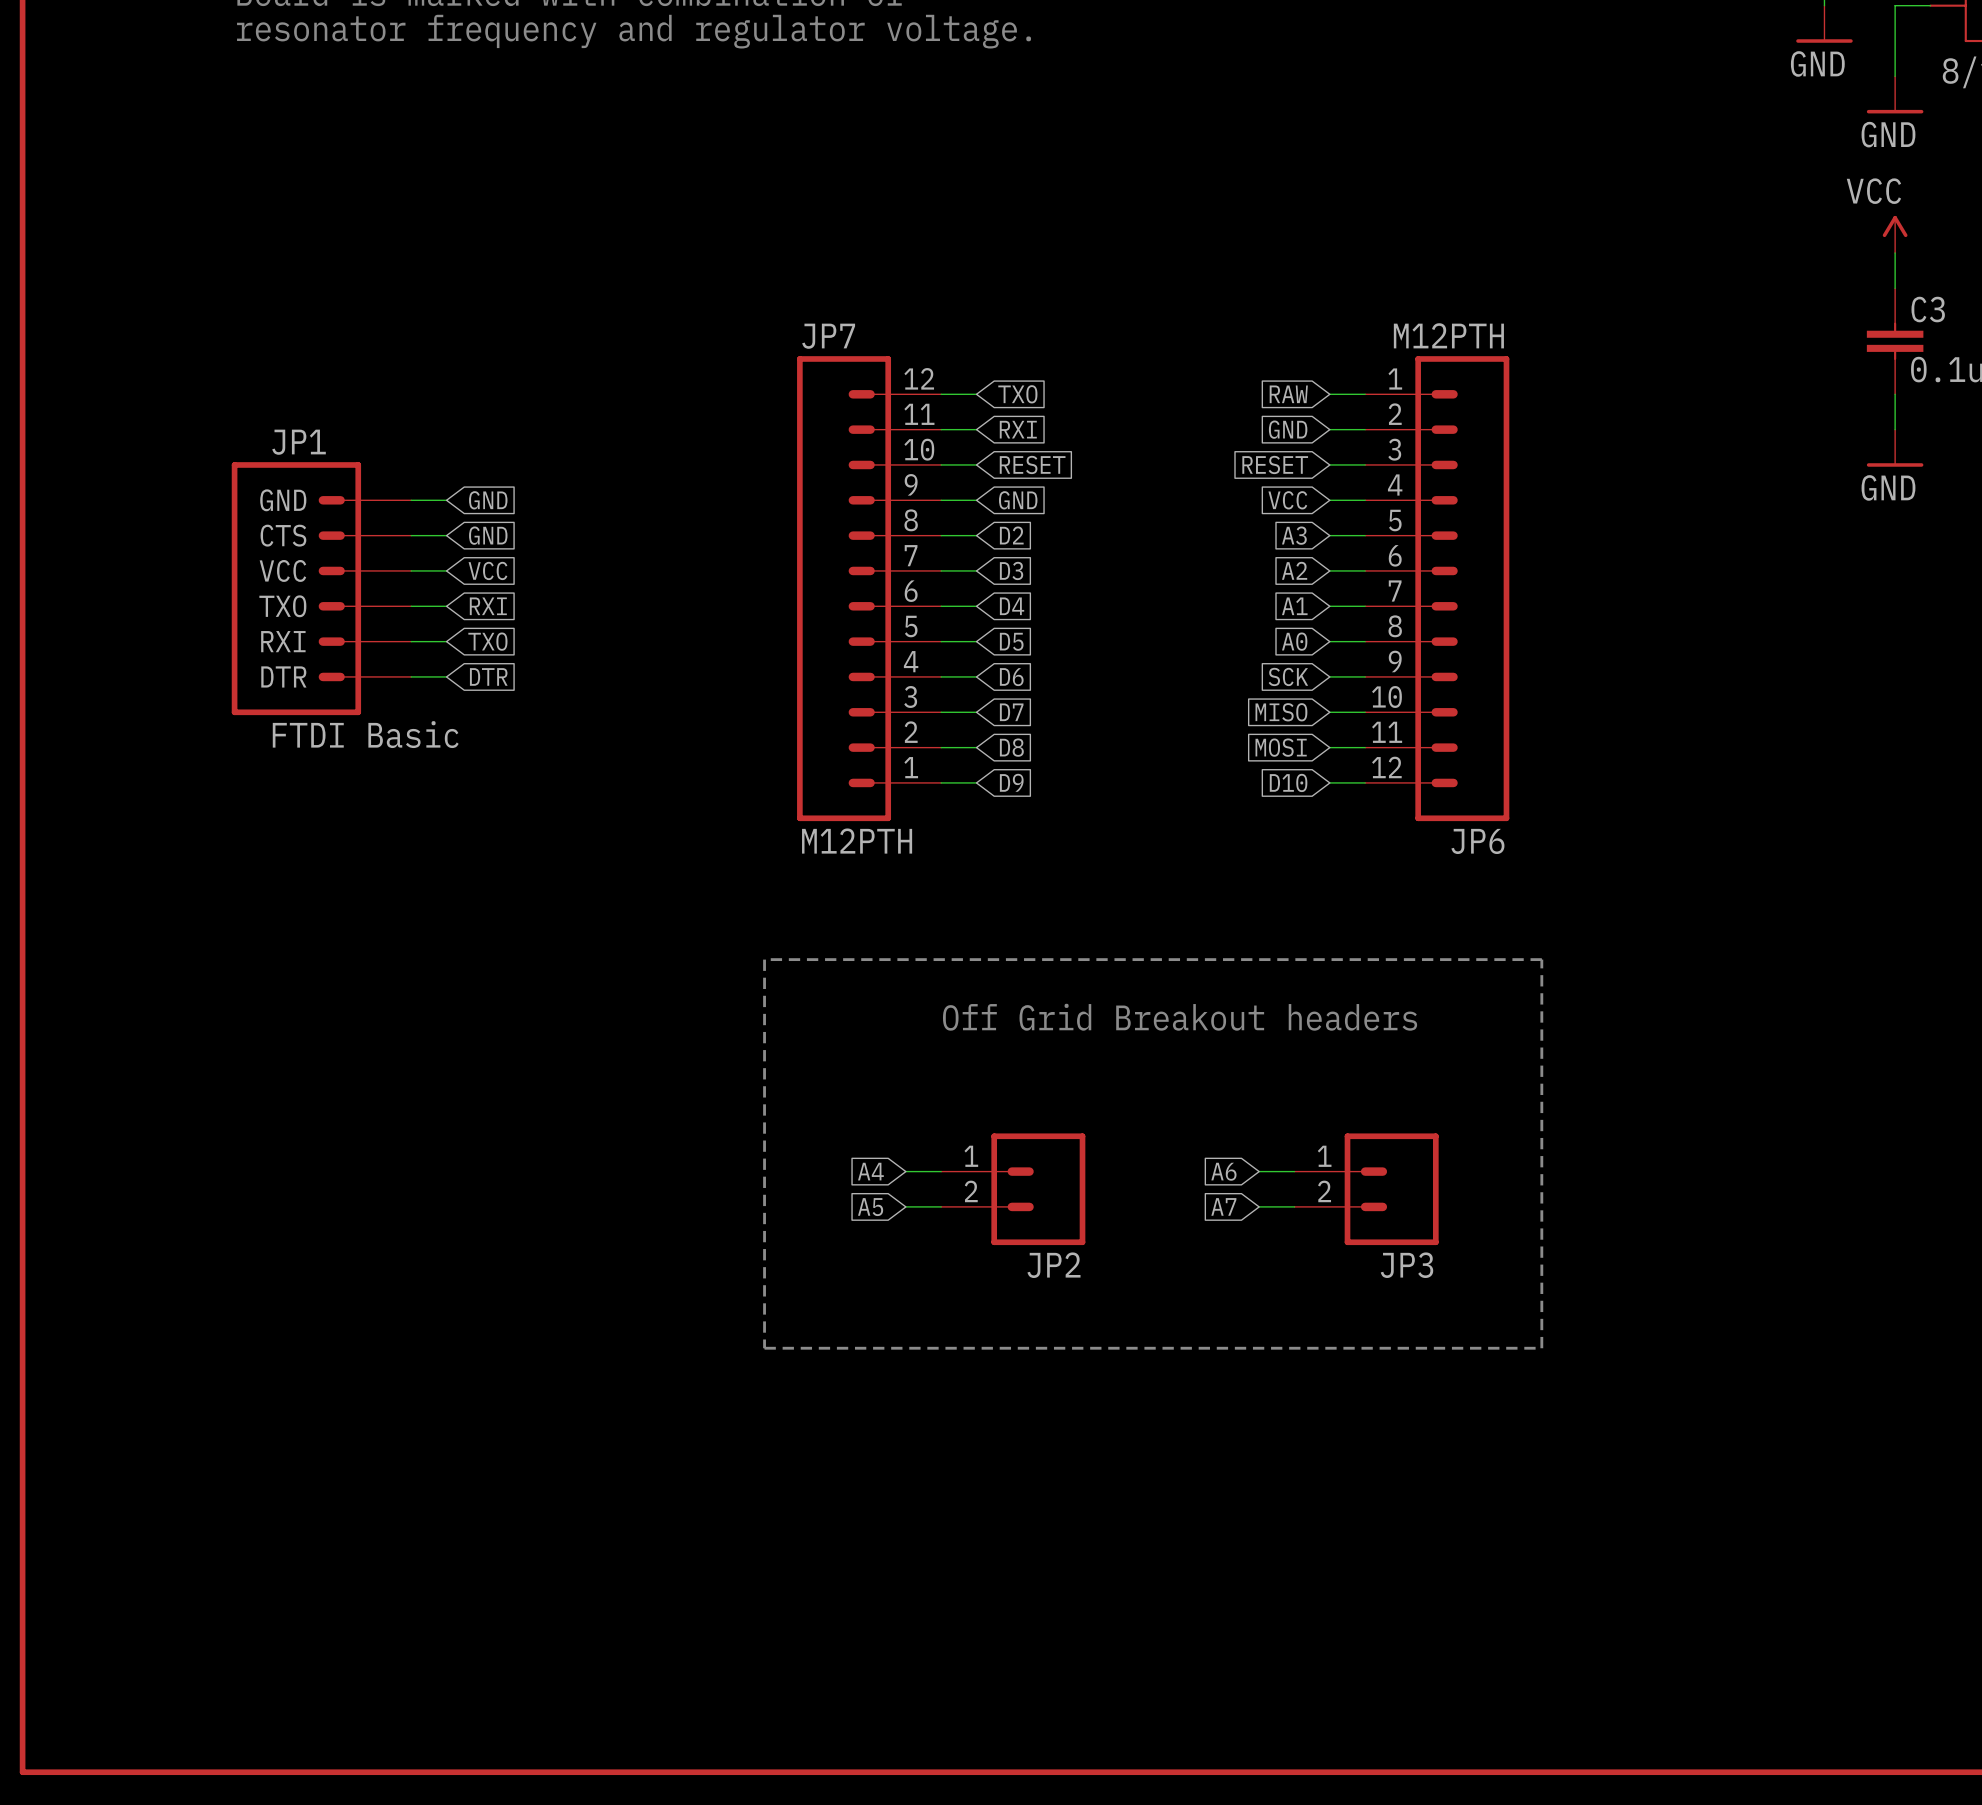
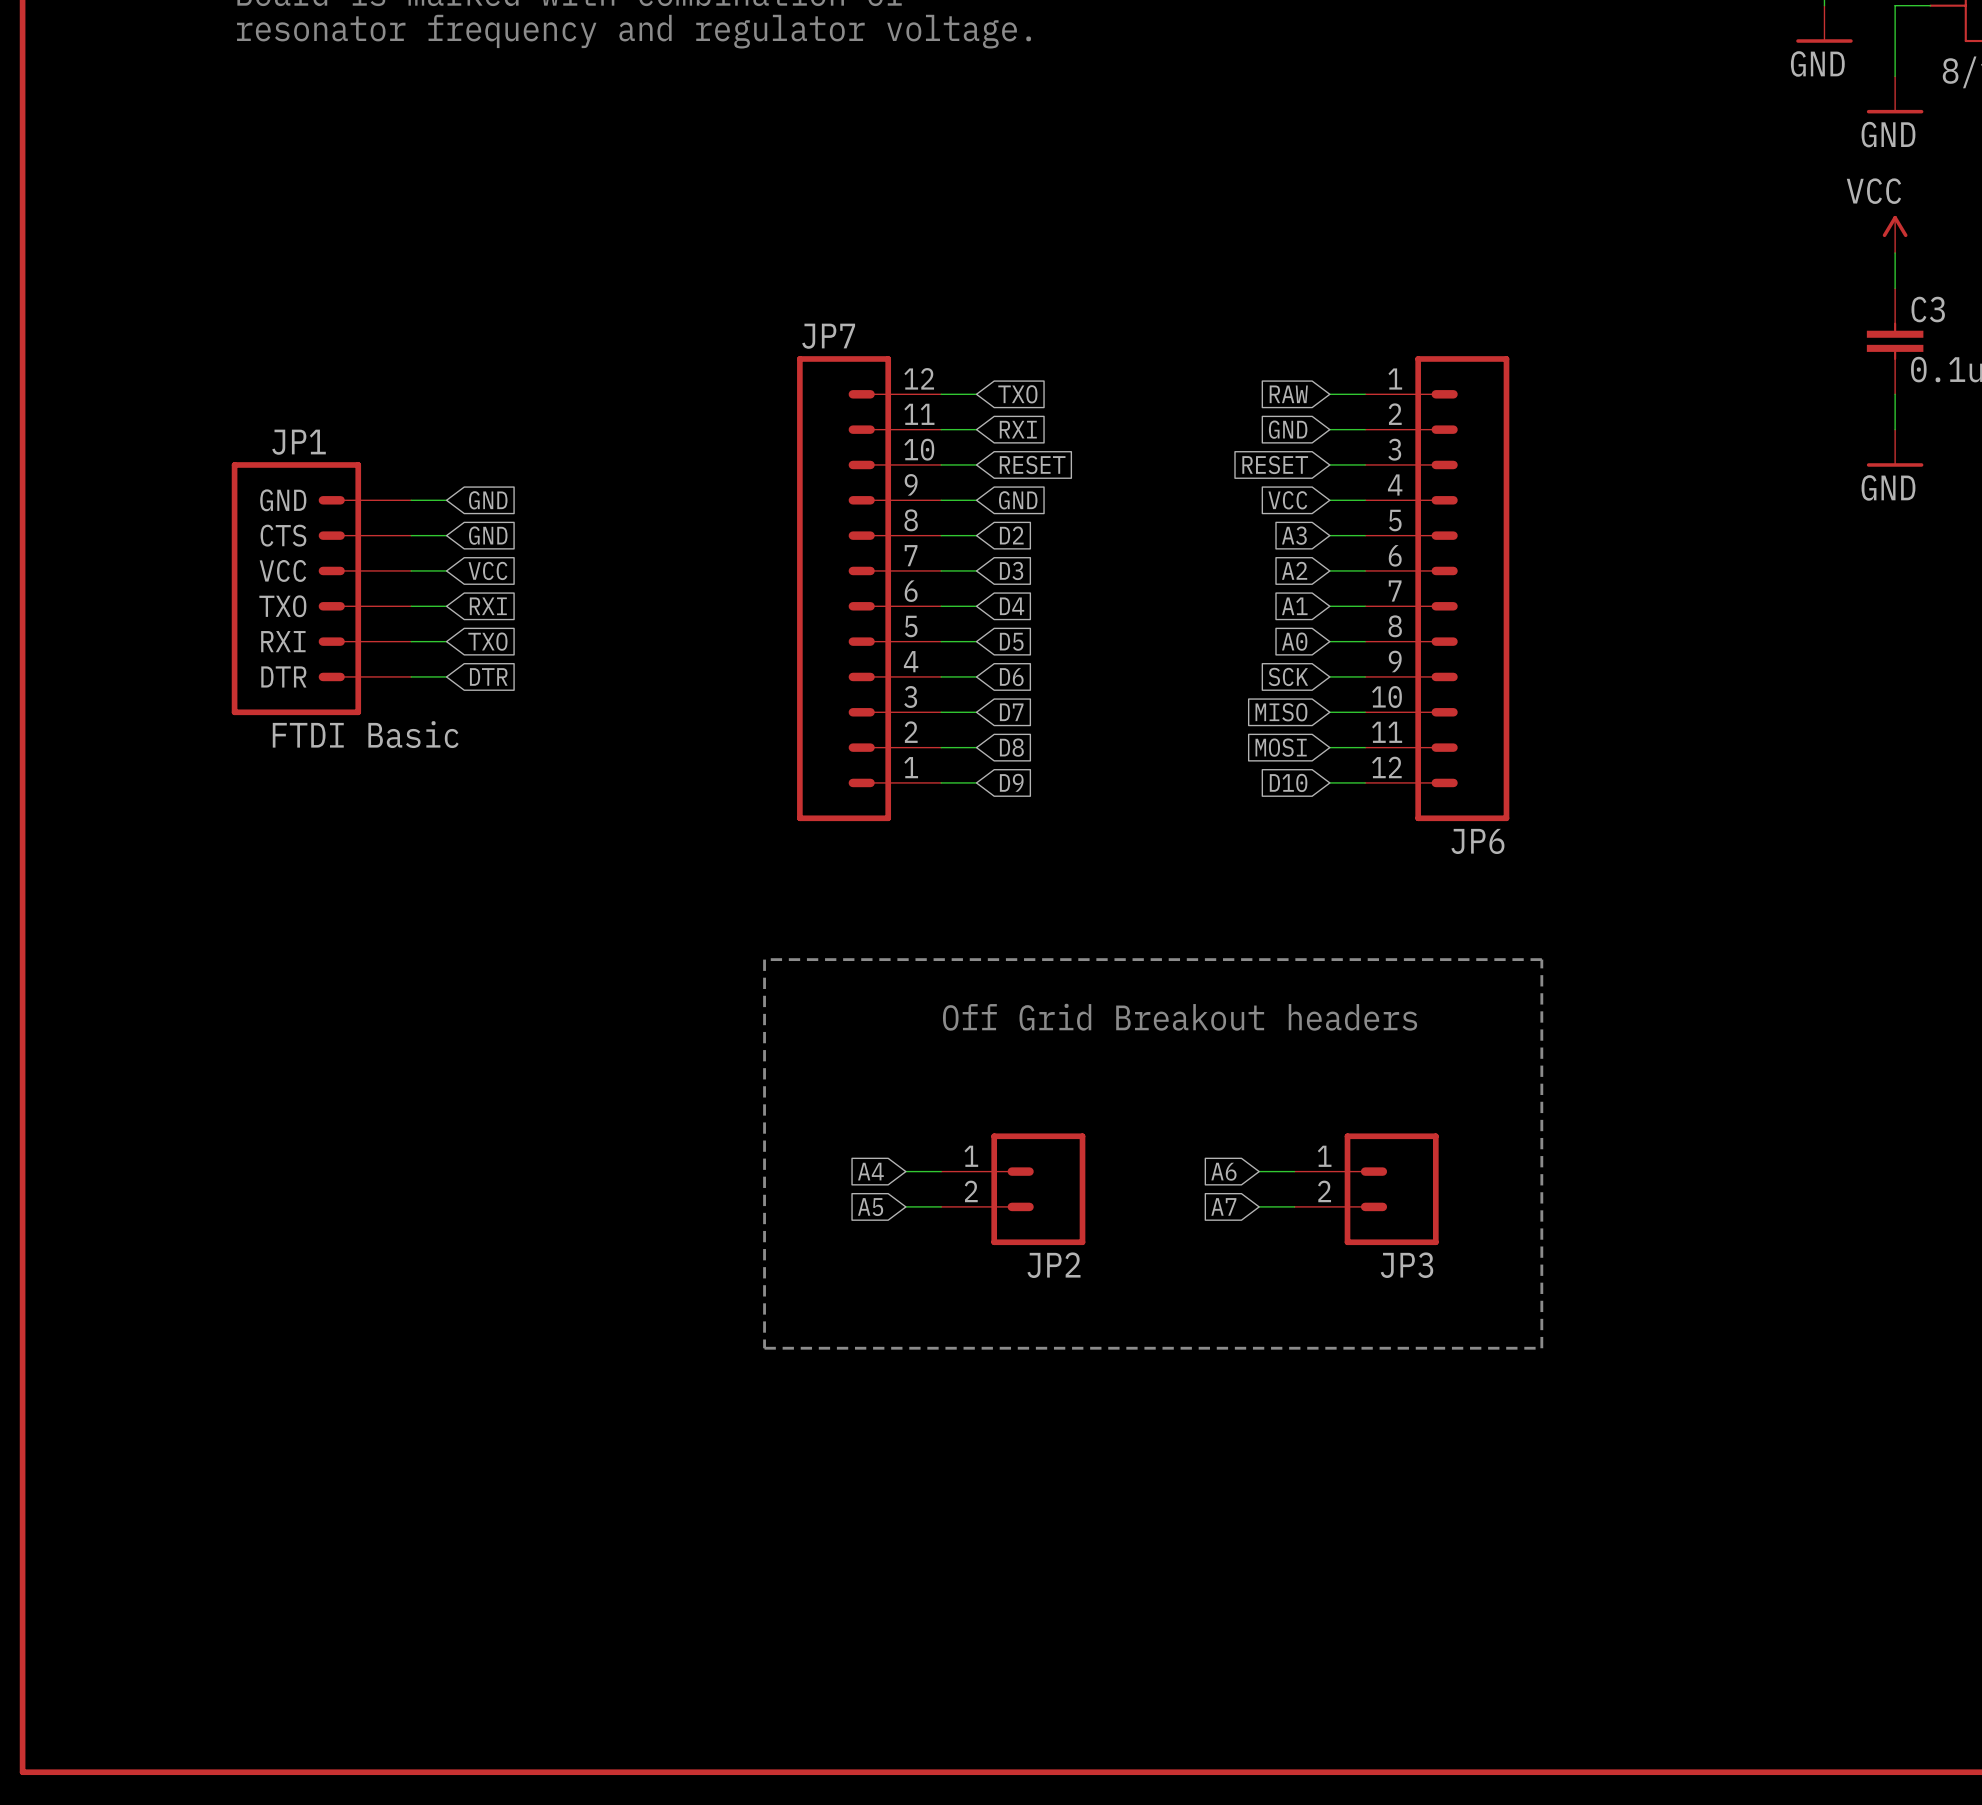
JP6 value: M12PTH (1448, 335) -> none
JP7 value: M12PTH (857, 841) -> none

